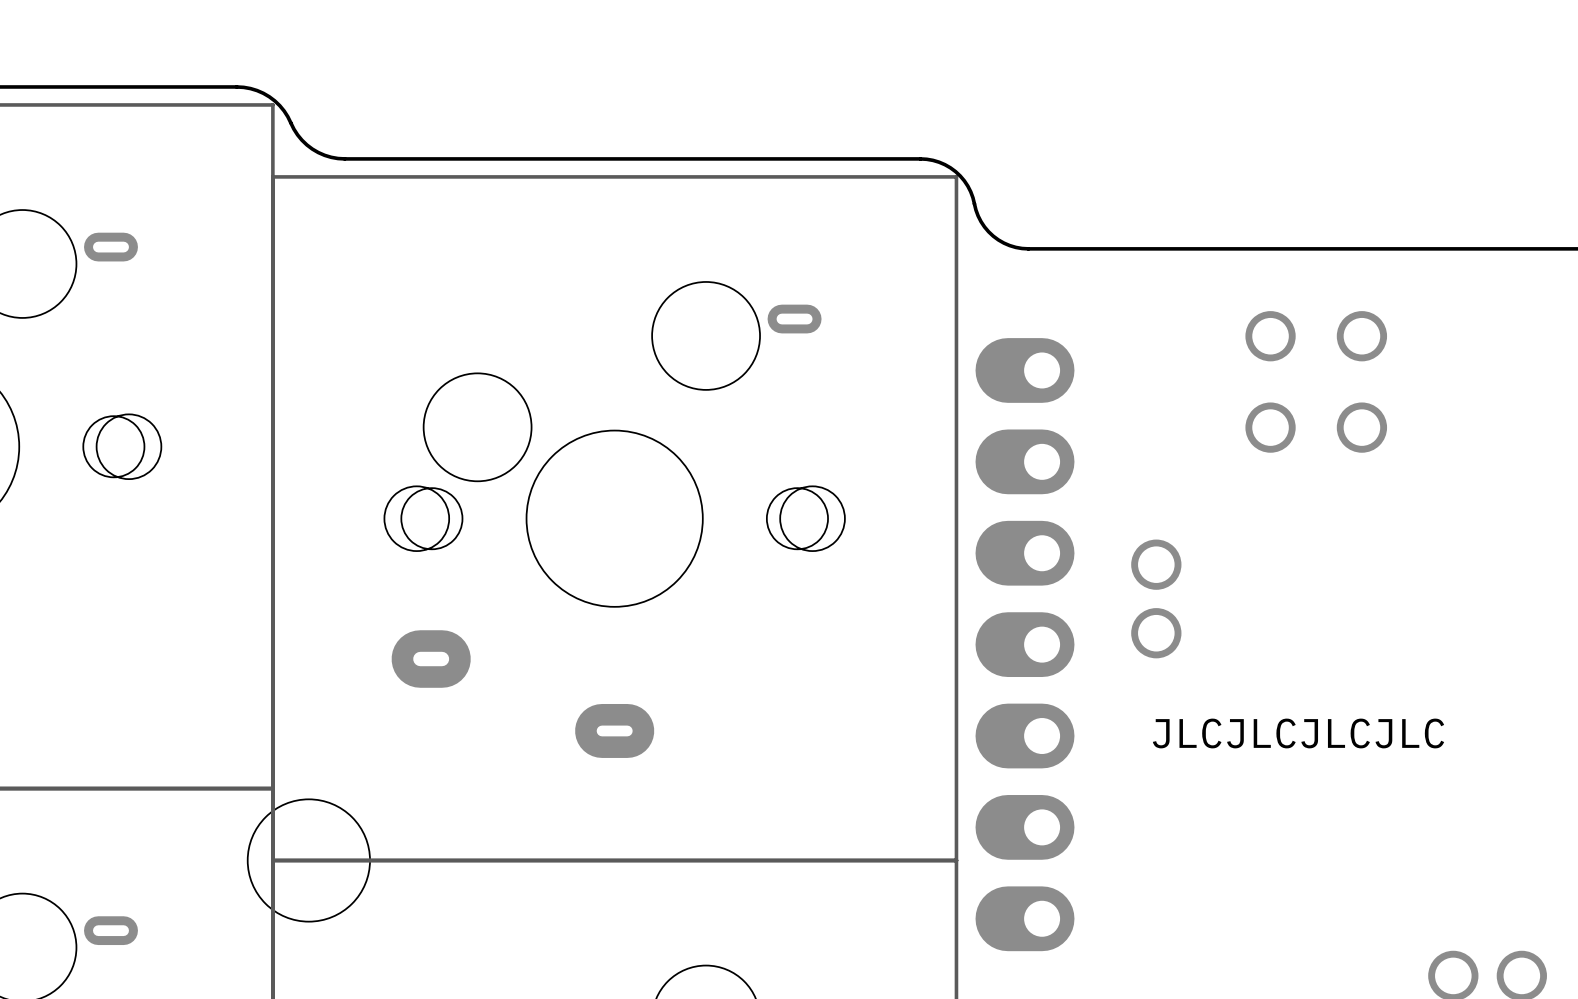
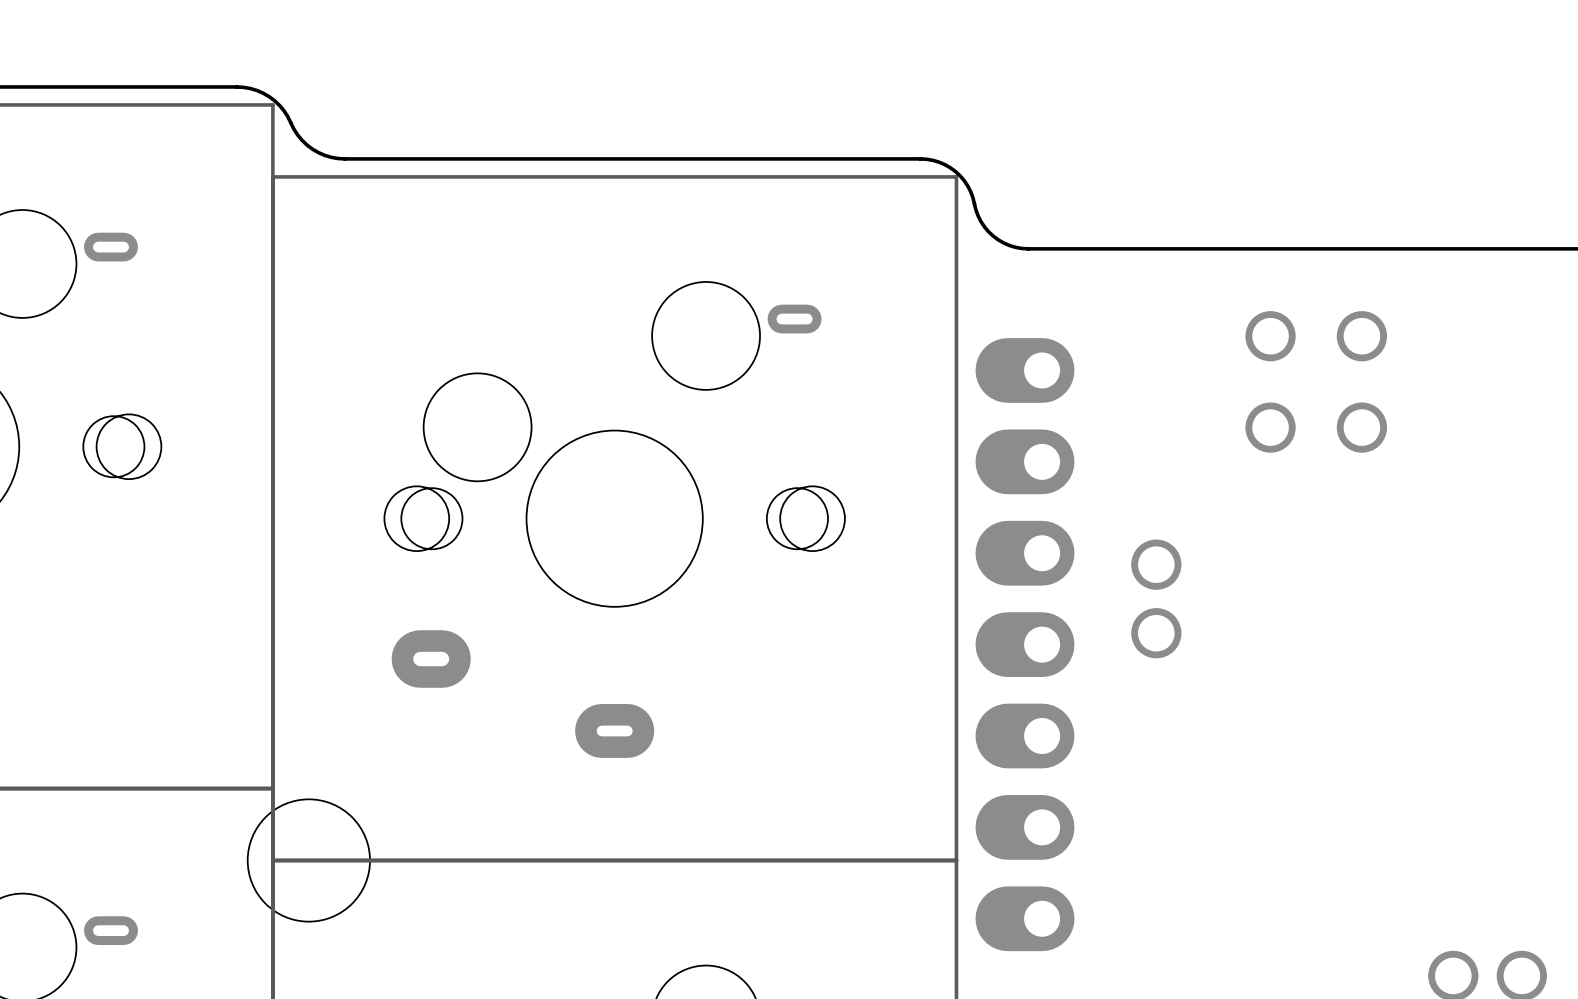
text: JLCJLCJLCJLC (1298, 733) -> none

